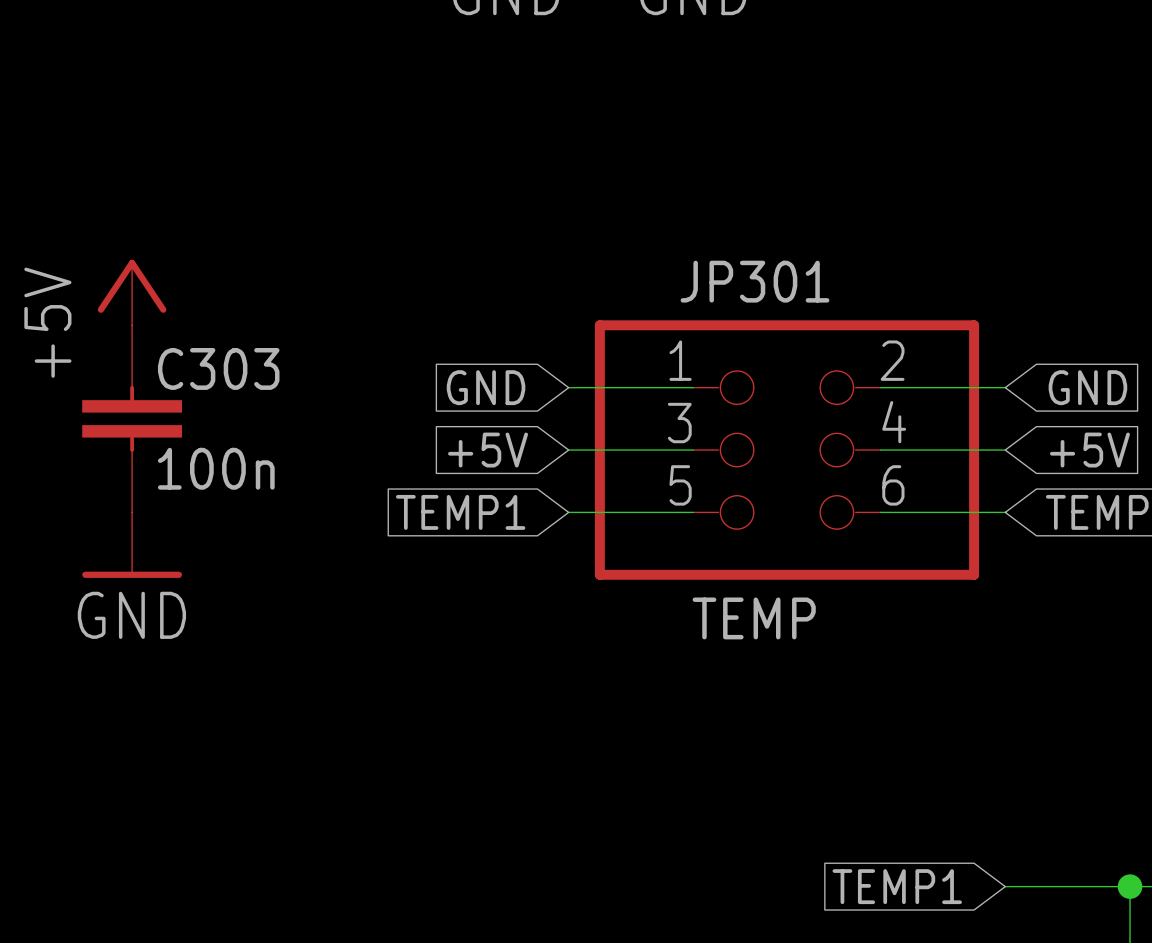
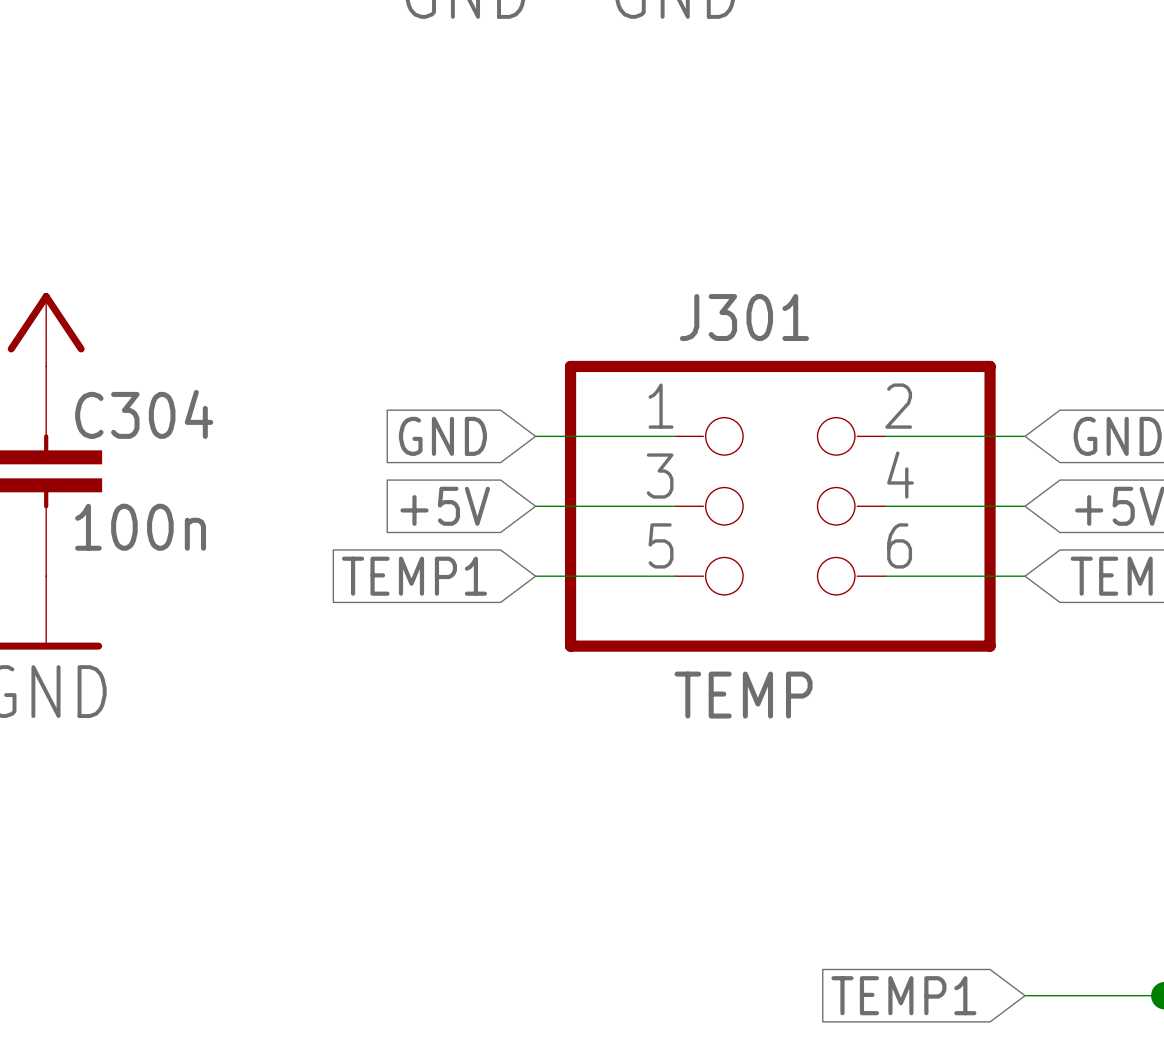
JP301 name: JP301 (754, 281) -> J301 (744, 317)
C303 name: C303 (218, 368) -> C304 (144, 414)

